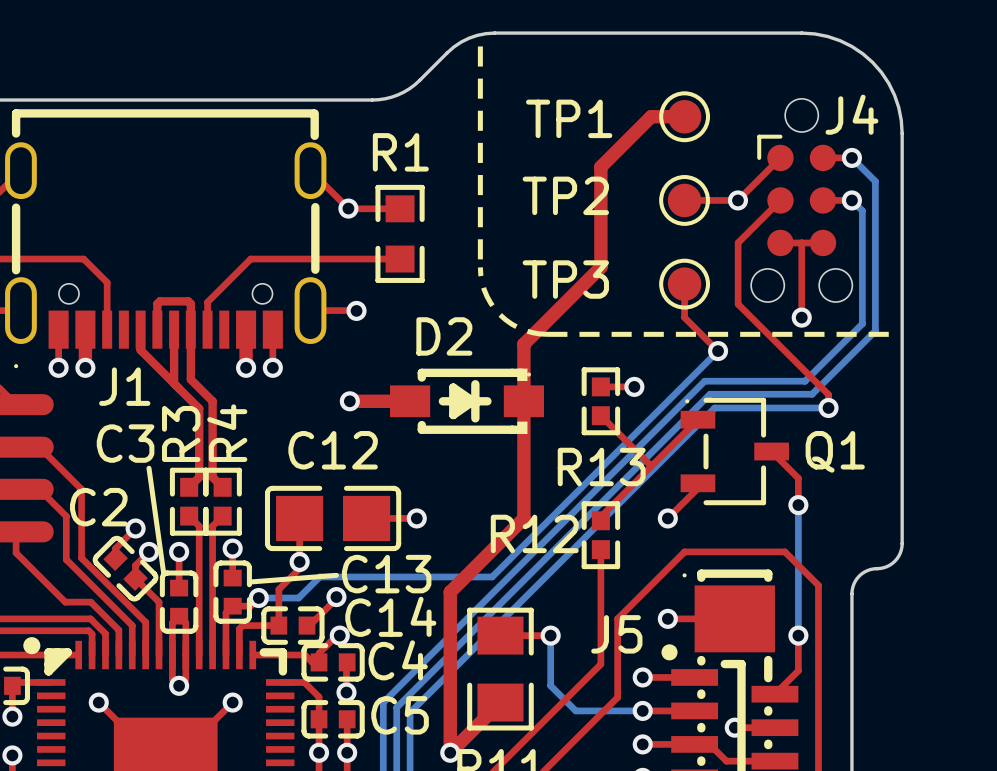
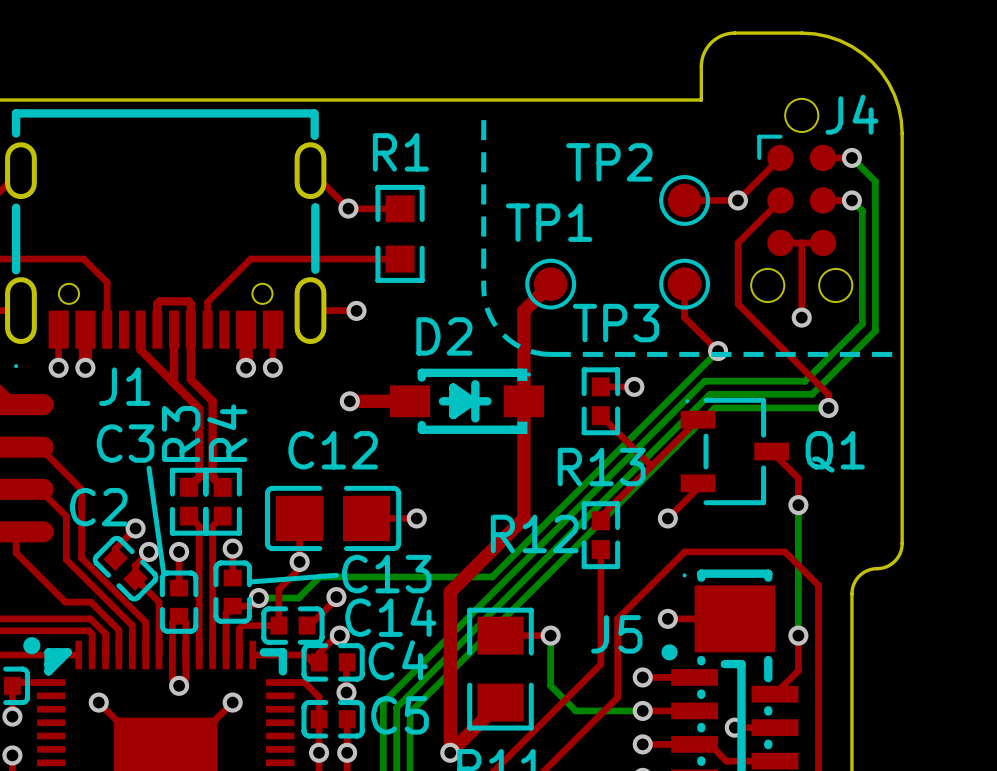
board edge: (734, 33) (485, 33) (469, 38) (453, 46) (414, 84) (403, 92) (385, 98) (372, 100) -> (734, 33) (716, 38) (704, 52) (701, 62) (701, 100) (372, 100)
line: (480, 46) (480, 274) (484, 289) (490, 303) (500, 314) (511, 324) (532, 332) (547, 334) (888, 334) -> none
top track: (684, 116) (651, 116) (600, 166) (600, 267) (523, 344) -> (550, 284) (523, 310) (523, 344)
TP1 position: (684, 116) -> (550, 284)
TP1 name position: TP1 (569, 118) -> TP1 (549, 222)
line: none -> (483, 120) (484, 294) (487, 309) (494, 323) (503, 334) (515, 344) (528, 350) (550, 354) (892, 354)
TP2 name position: TP2 (565, 195) -> TP2 (609, 162)
TP3 name position: TP3 (565, 279) -> TP3 (616, 323)

